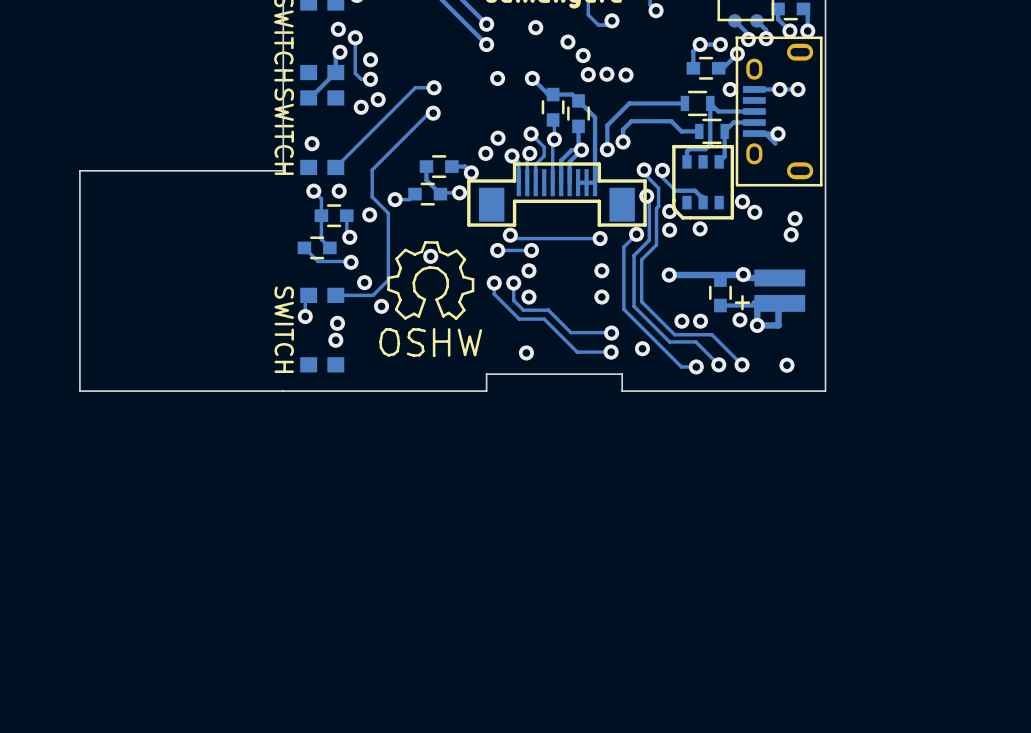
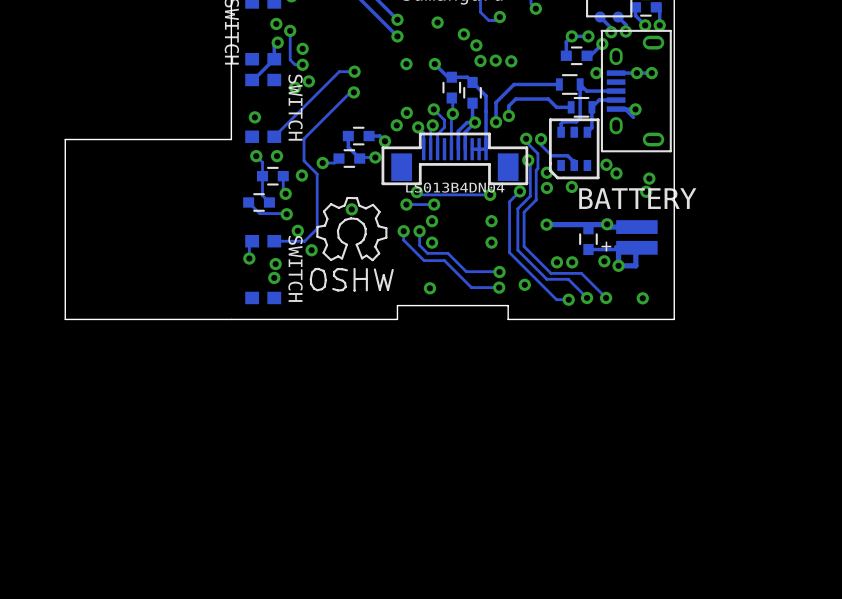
part value position: SWITCH (284, 131) -> SWITCH (295, 107)
part value: none -> LS013B4DN04 (455, 187)
part value: none -> BATTERY (637, 198)
part value position: SWITCH (284, 329) -> SWITCH (295, 268)

